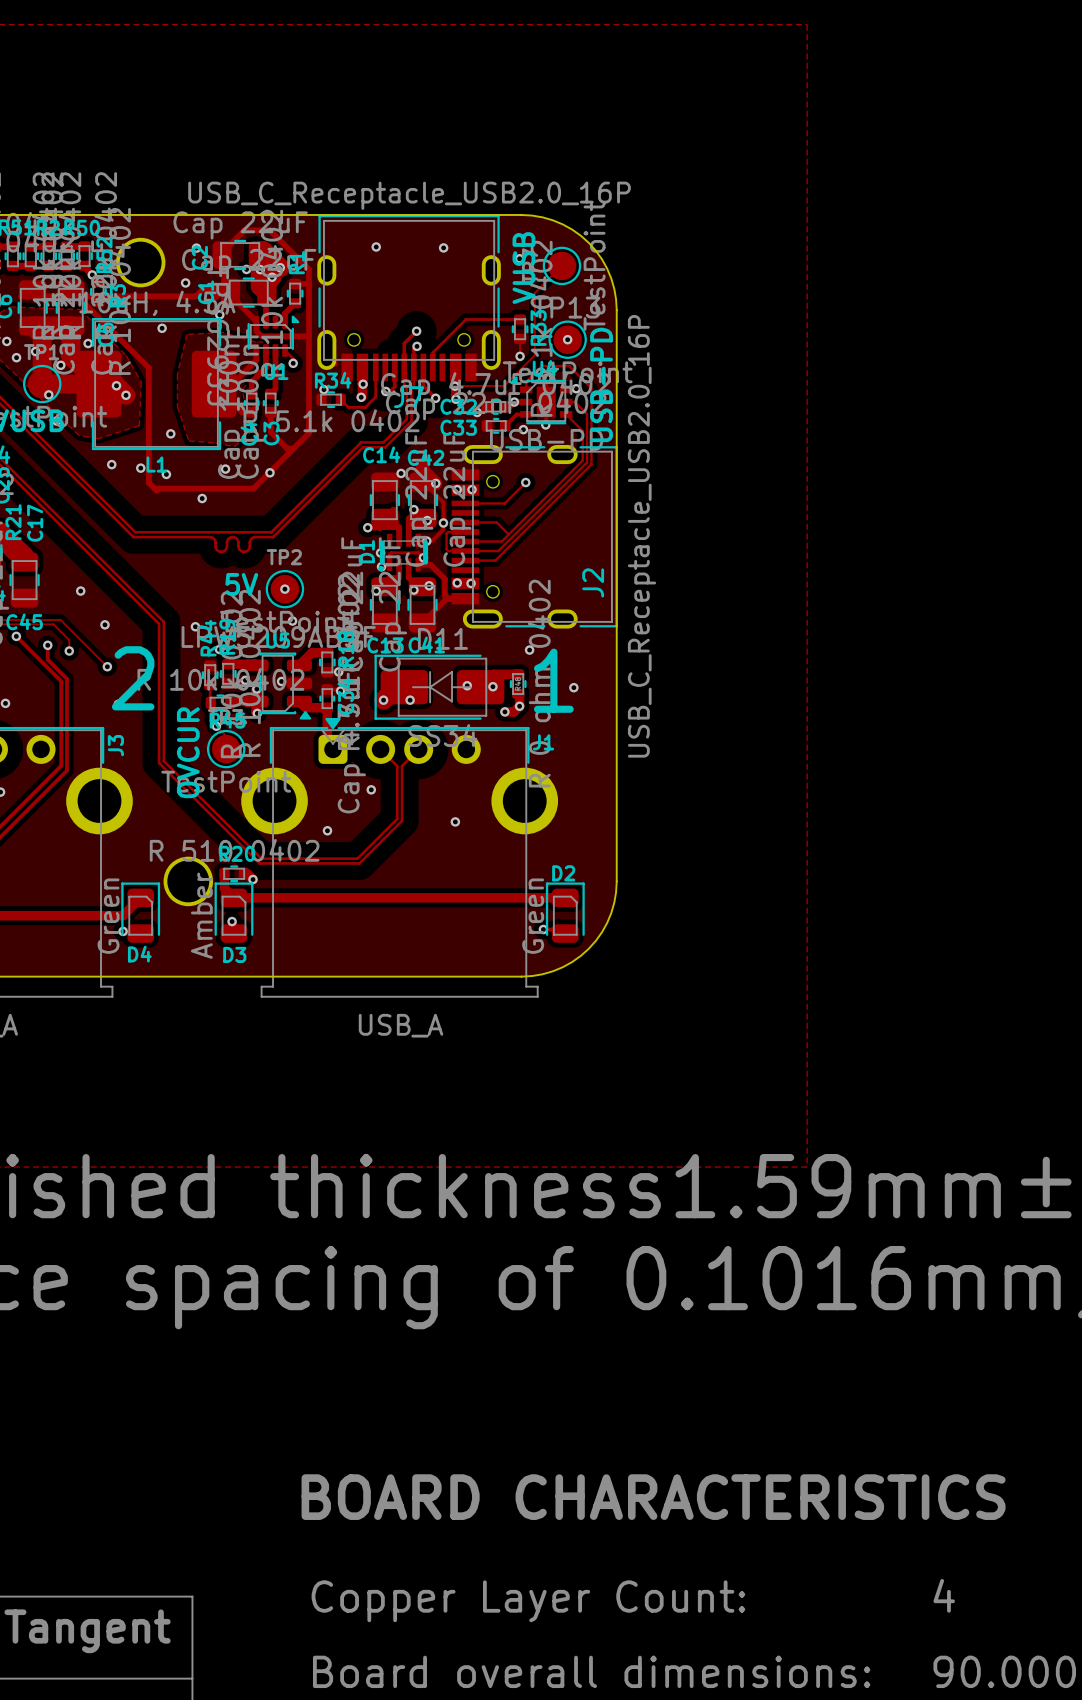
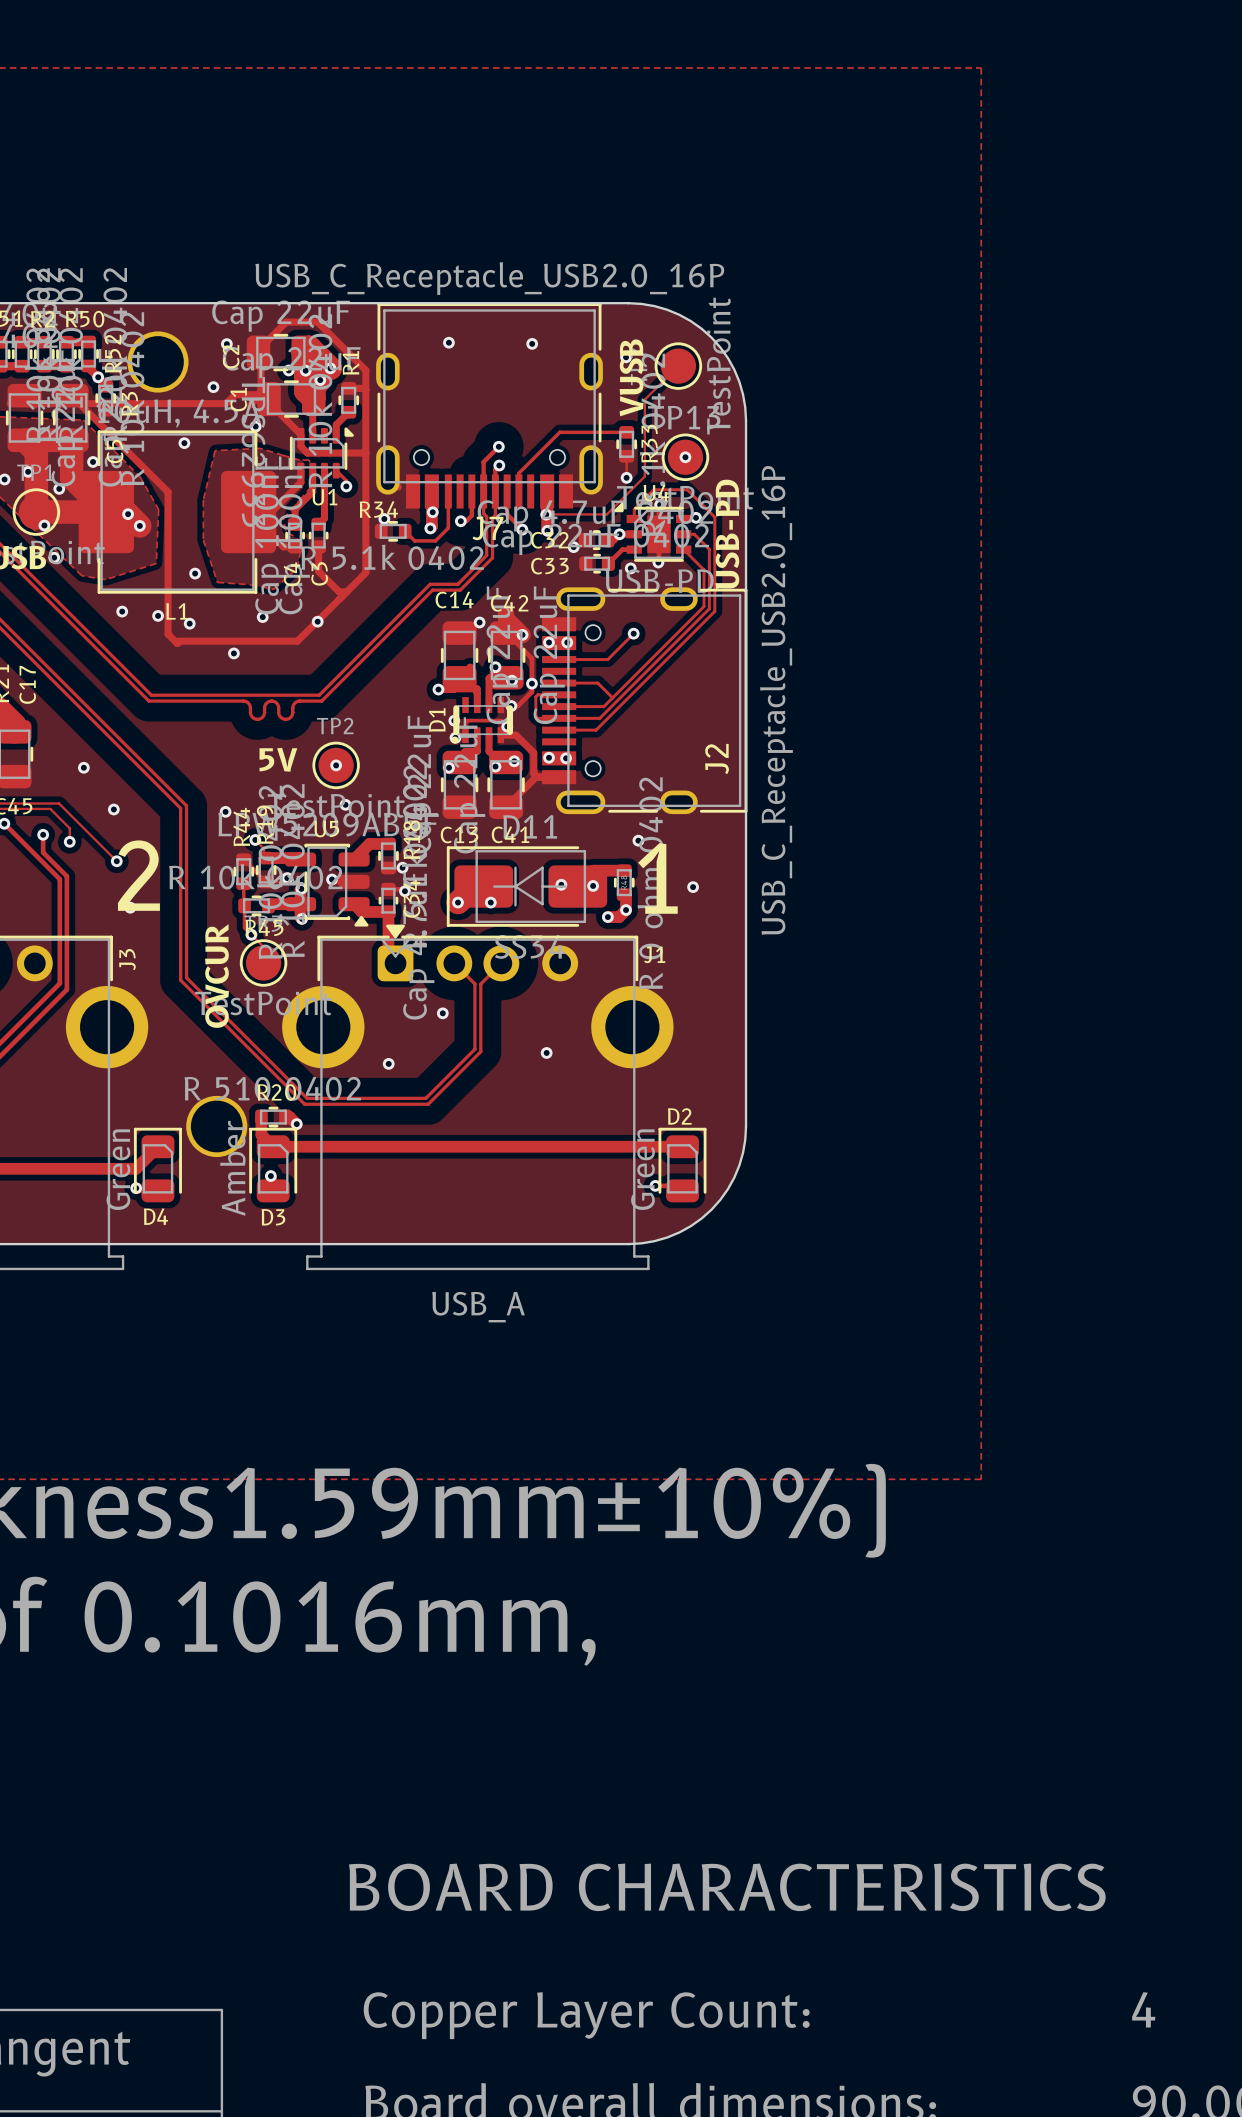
R34 name position: R34 (333, 380) -> R34 (378, 509)

